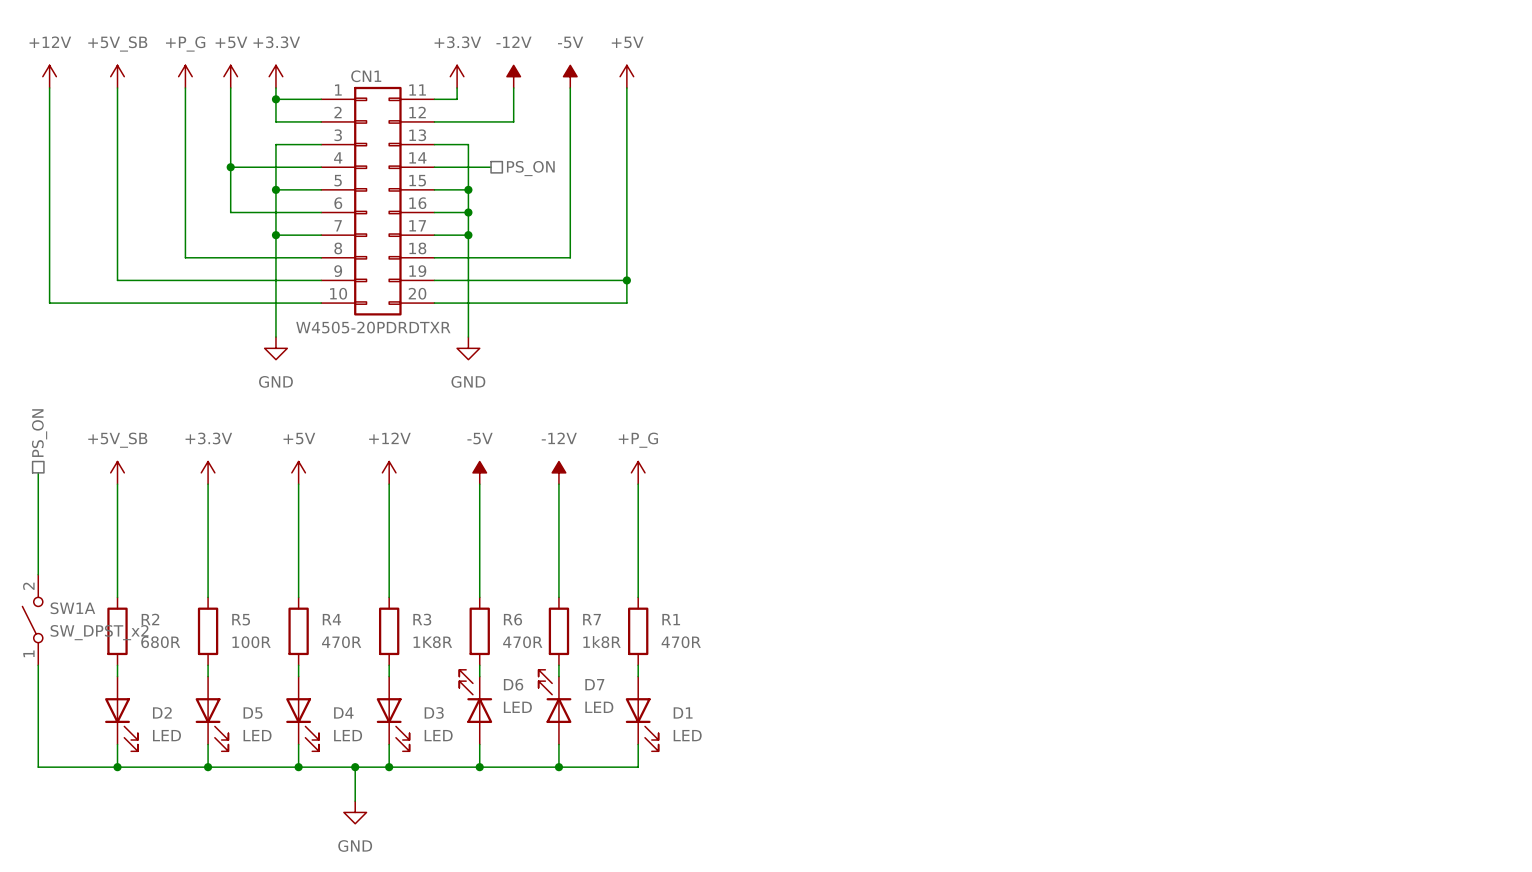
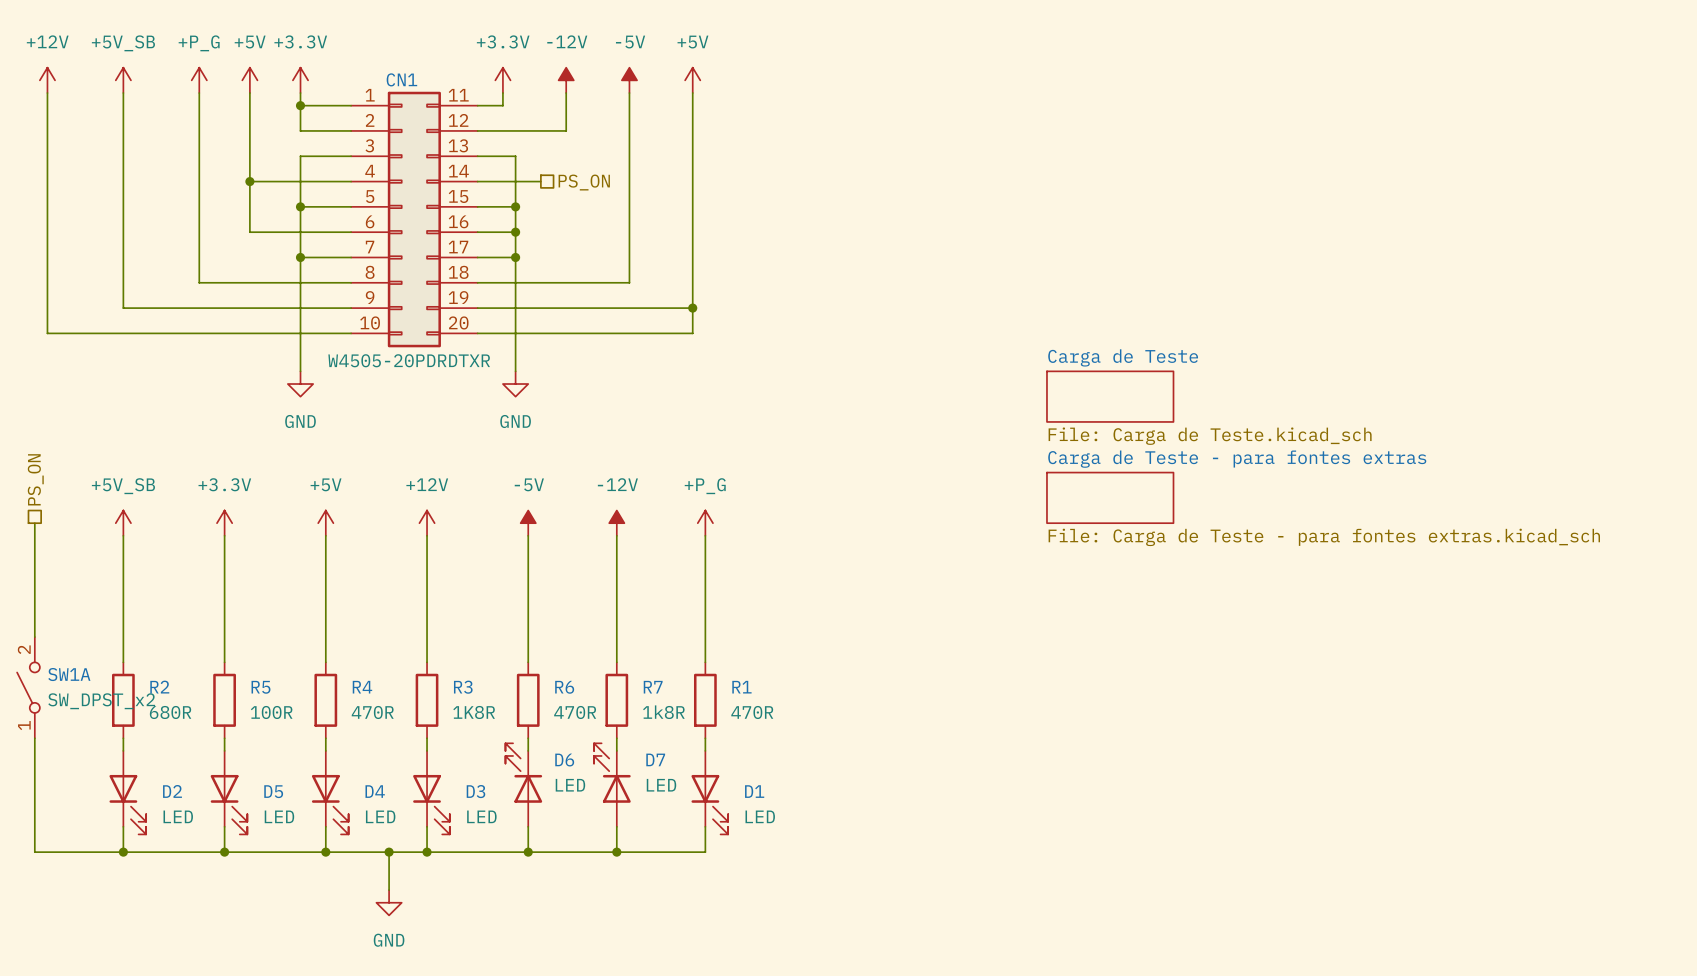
sheet Carga de Teste: none -> File: Carga de Teste.kicad_sch (1110, 396)
sheet Carga de Teste - para fontes extras: none -> File: Carga de Teste - para fontes extras.kicad_sch (1110, 497)

